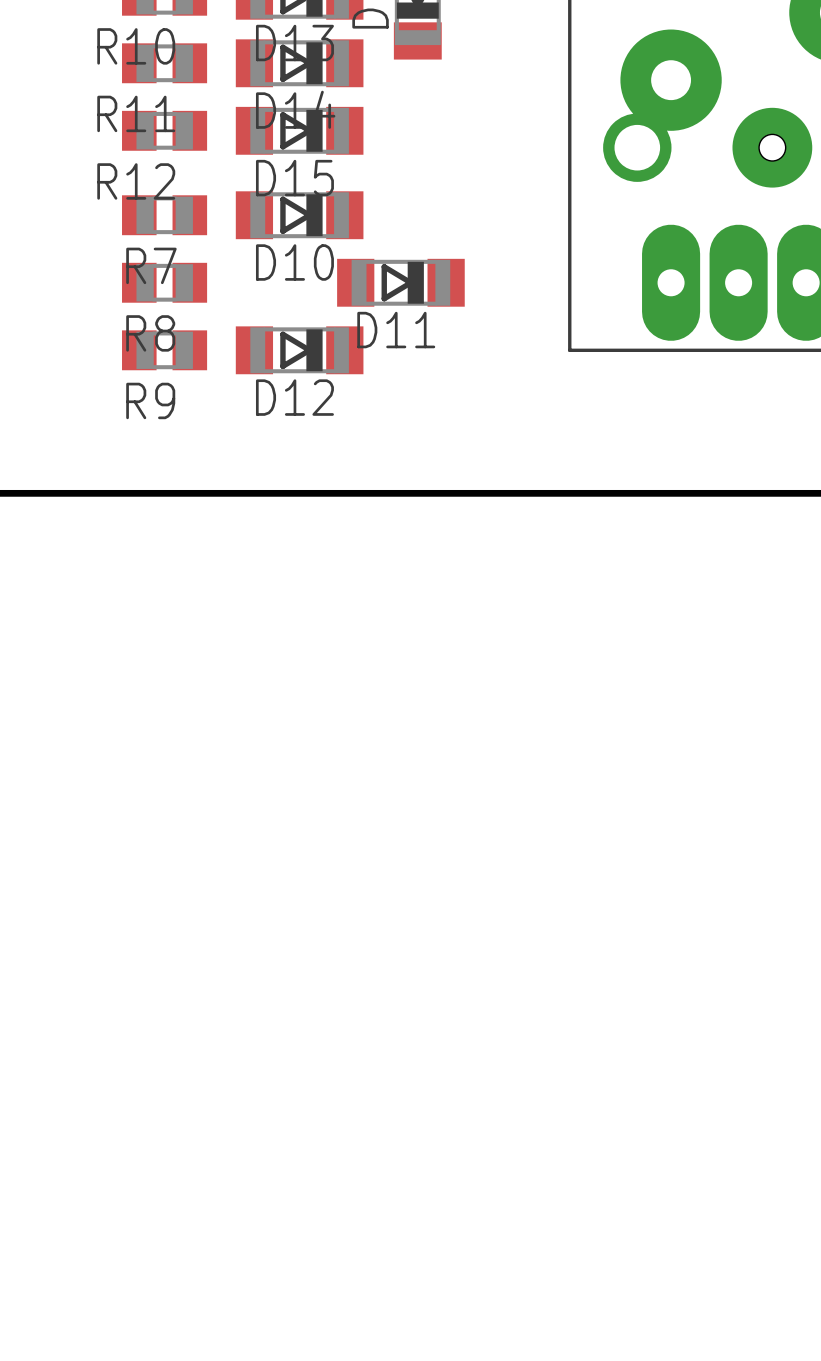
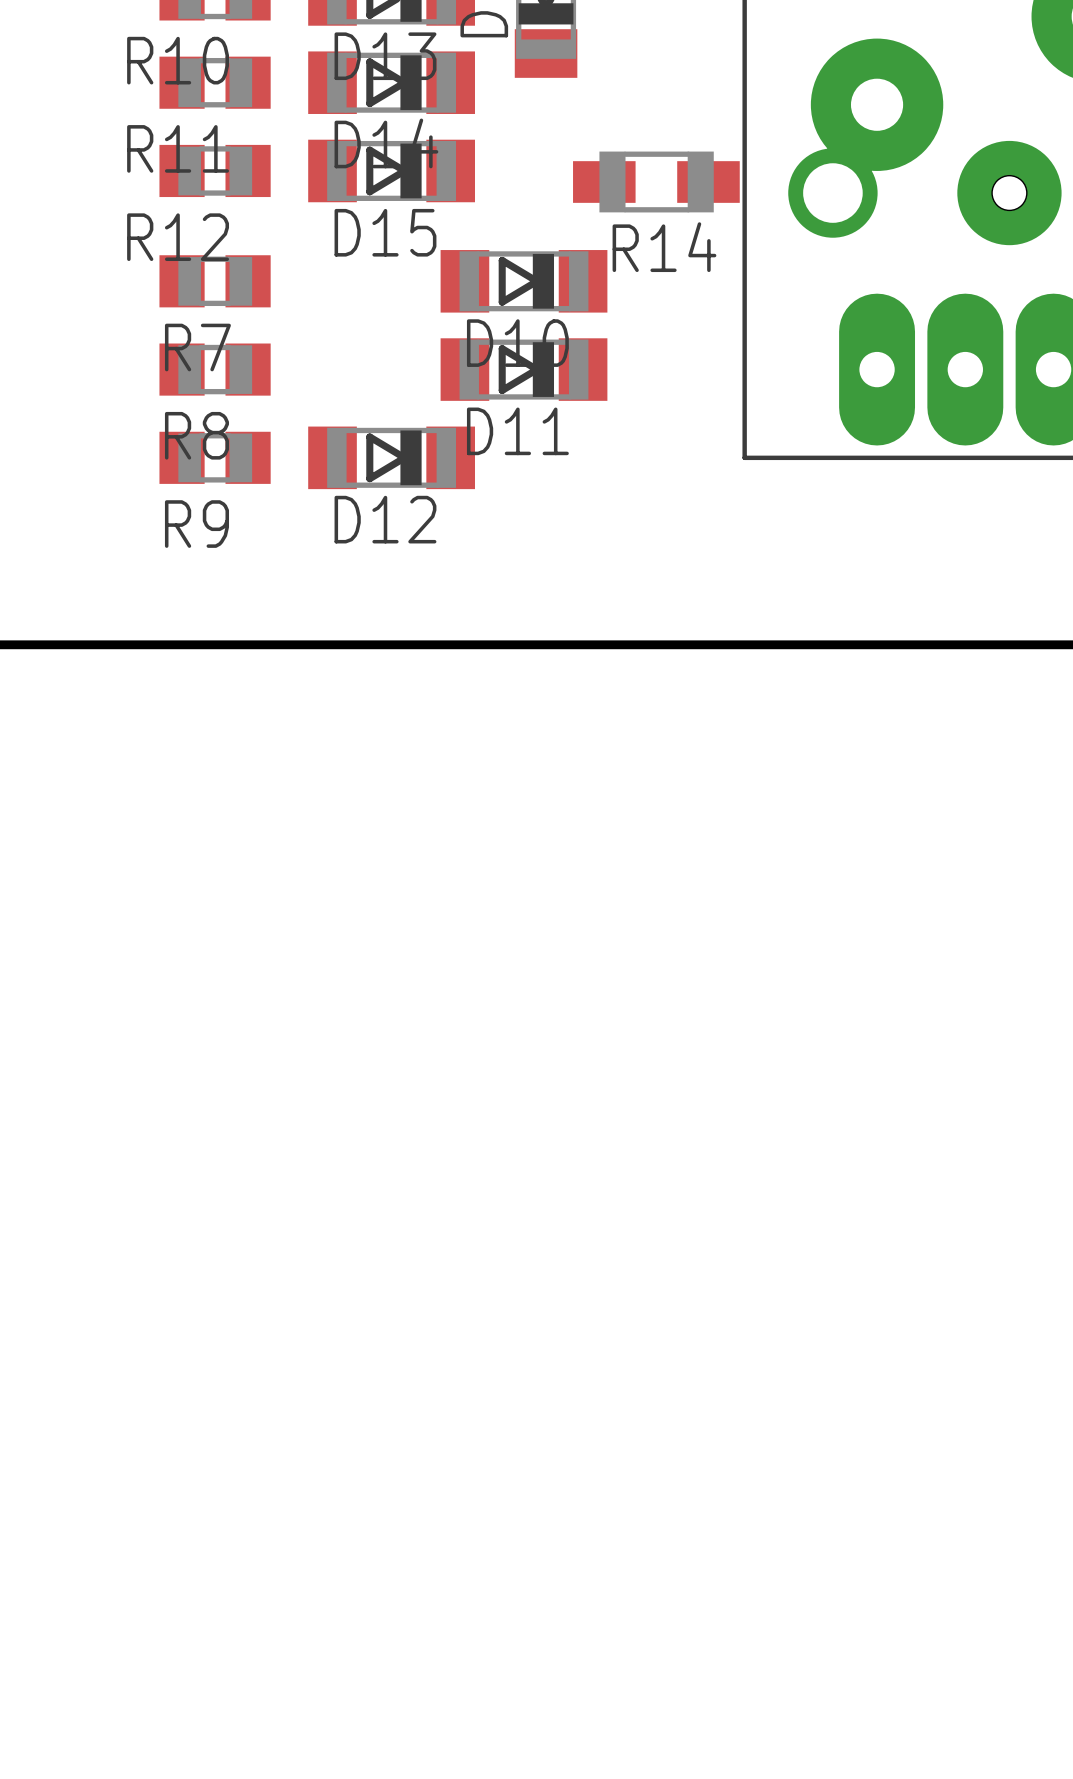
R14: none -> (656, 182)
D10 position: (299, 215) -> (523, 281)

